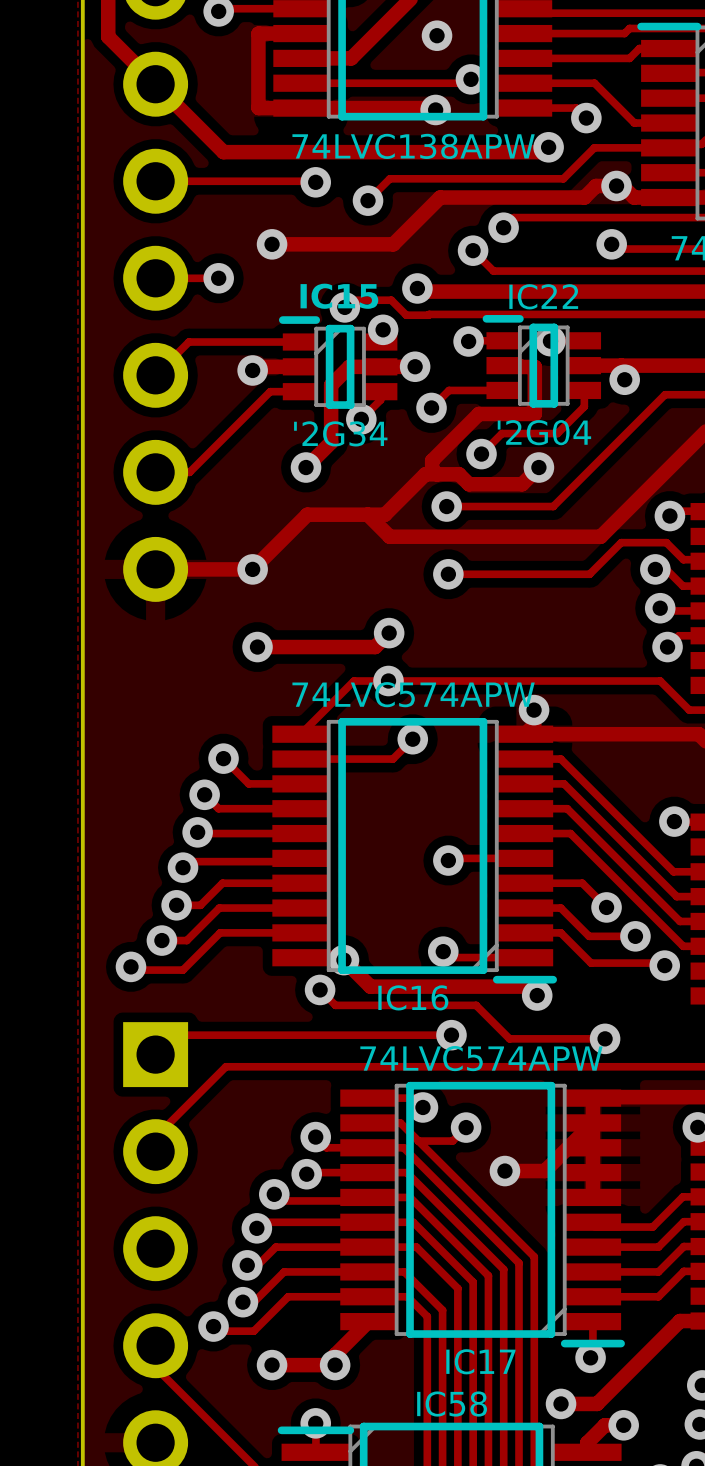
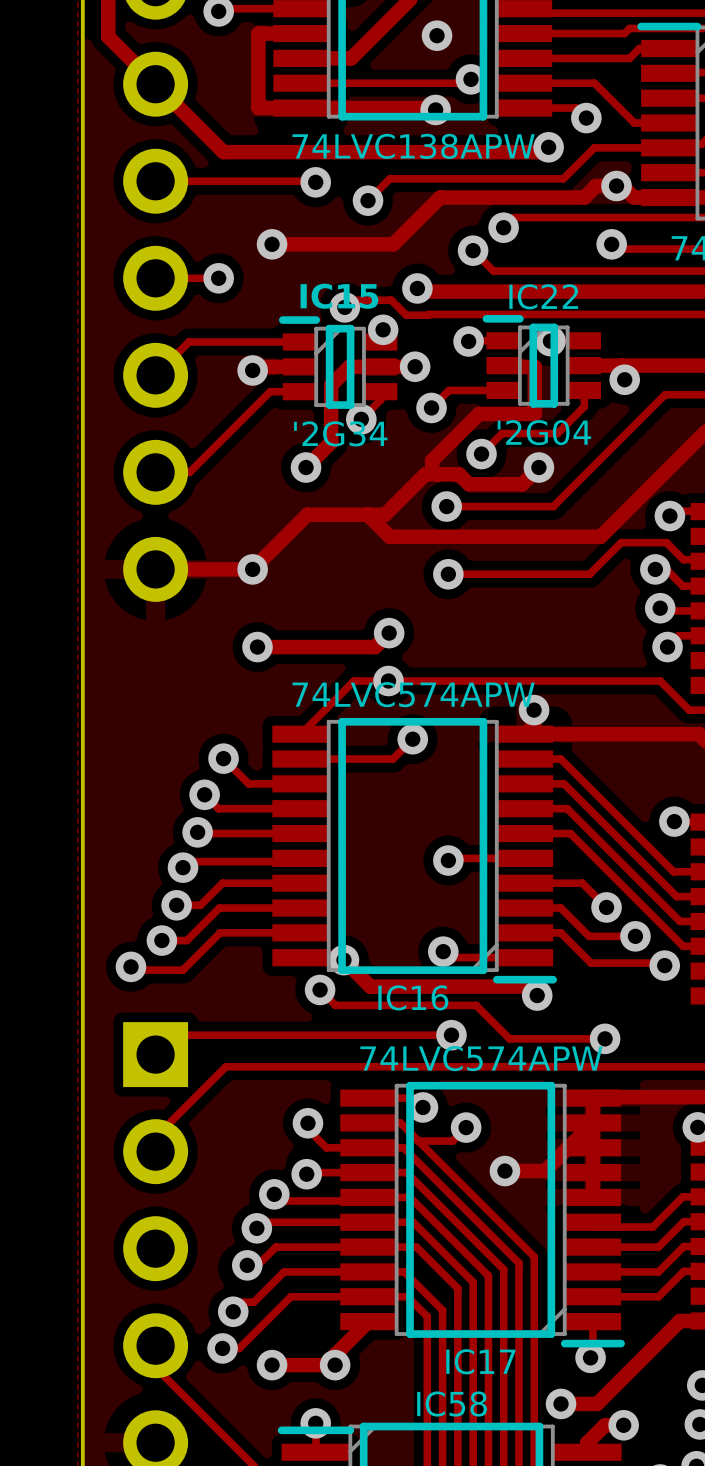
via position: (315, 1137) -> (307, 1123)
track: (290, 1296) (288, 1296) (253, 1331) (218, 1331) (213, 1326) -> (290, 1296) (239, 1348) (222, 1348)
via: (242, 1302) -> none
via: none -> (233, 1311)
via: (213, 1326) -> none
via: none -> (222, 1348)

